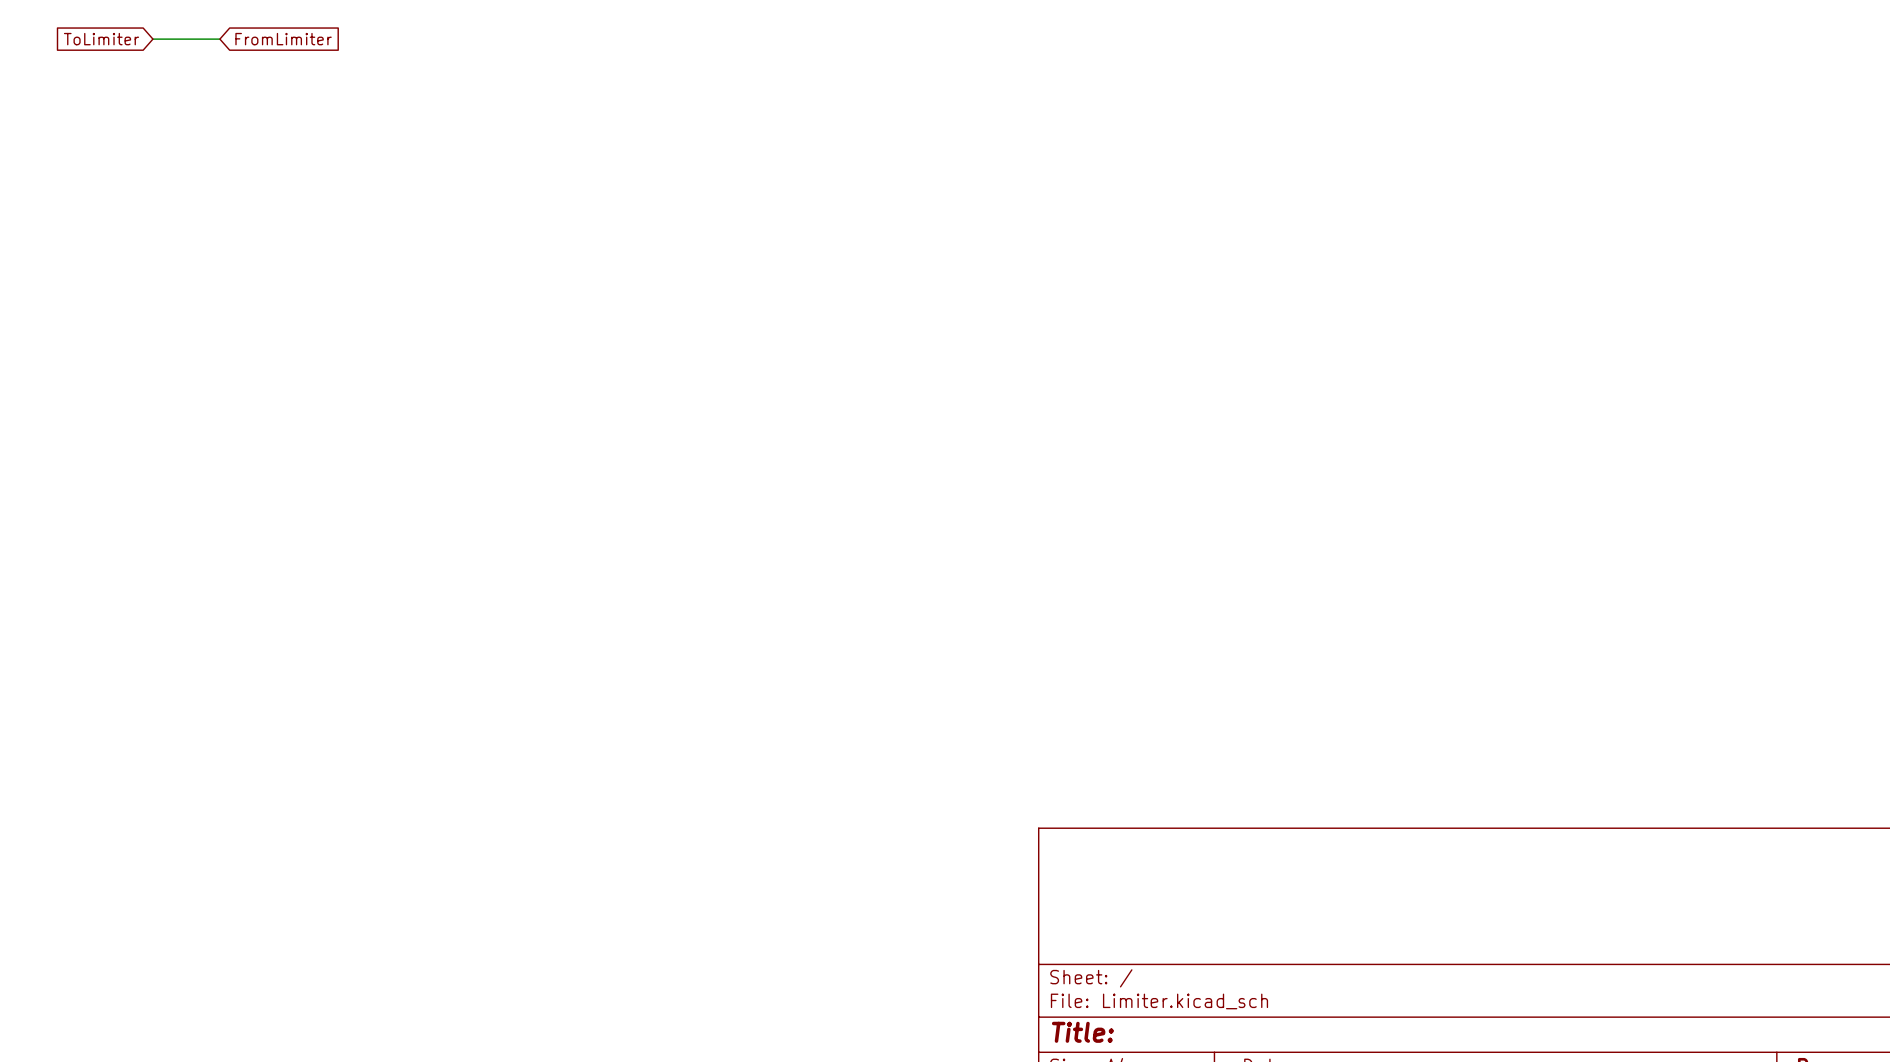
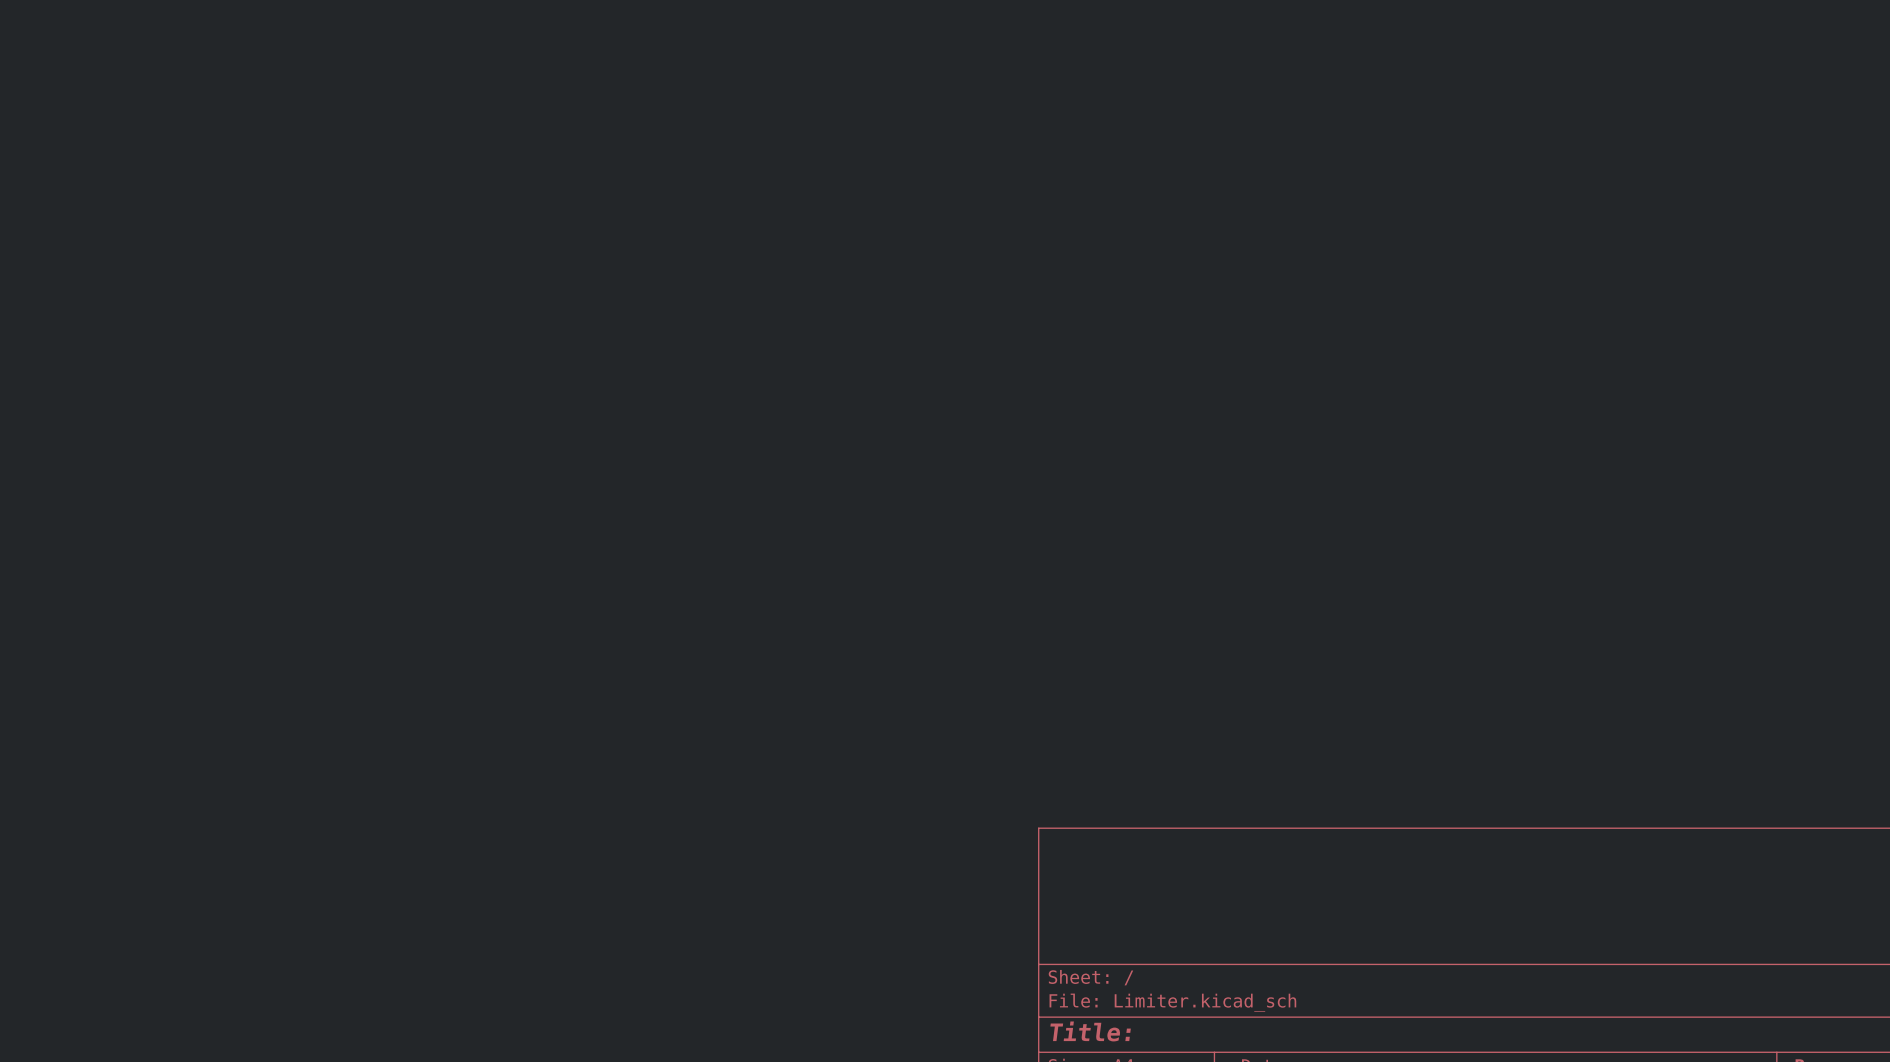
global label: ToLimiter (101, 39) -> none
wire: (152, 39) (219, 39) -> none
global label: FromLimiter (283, 39) -> none

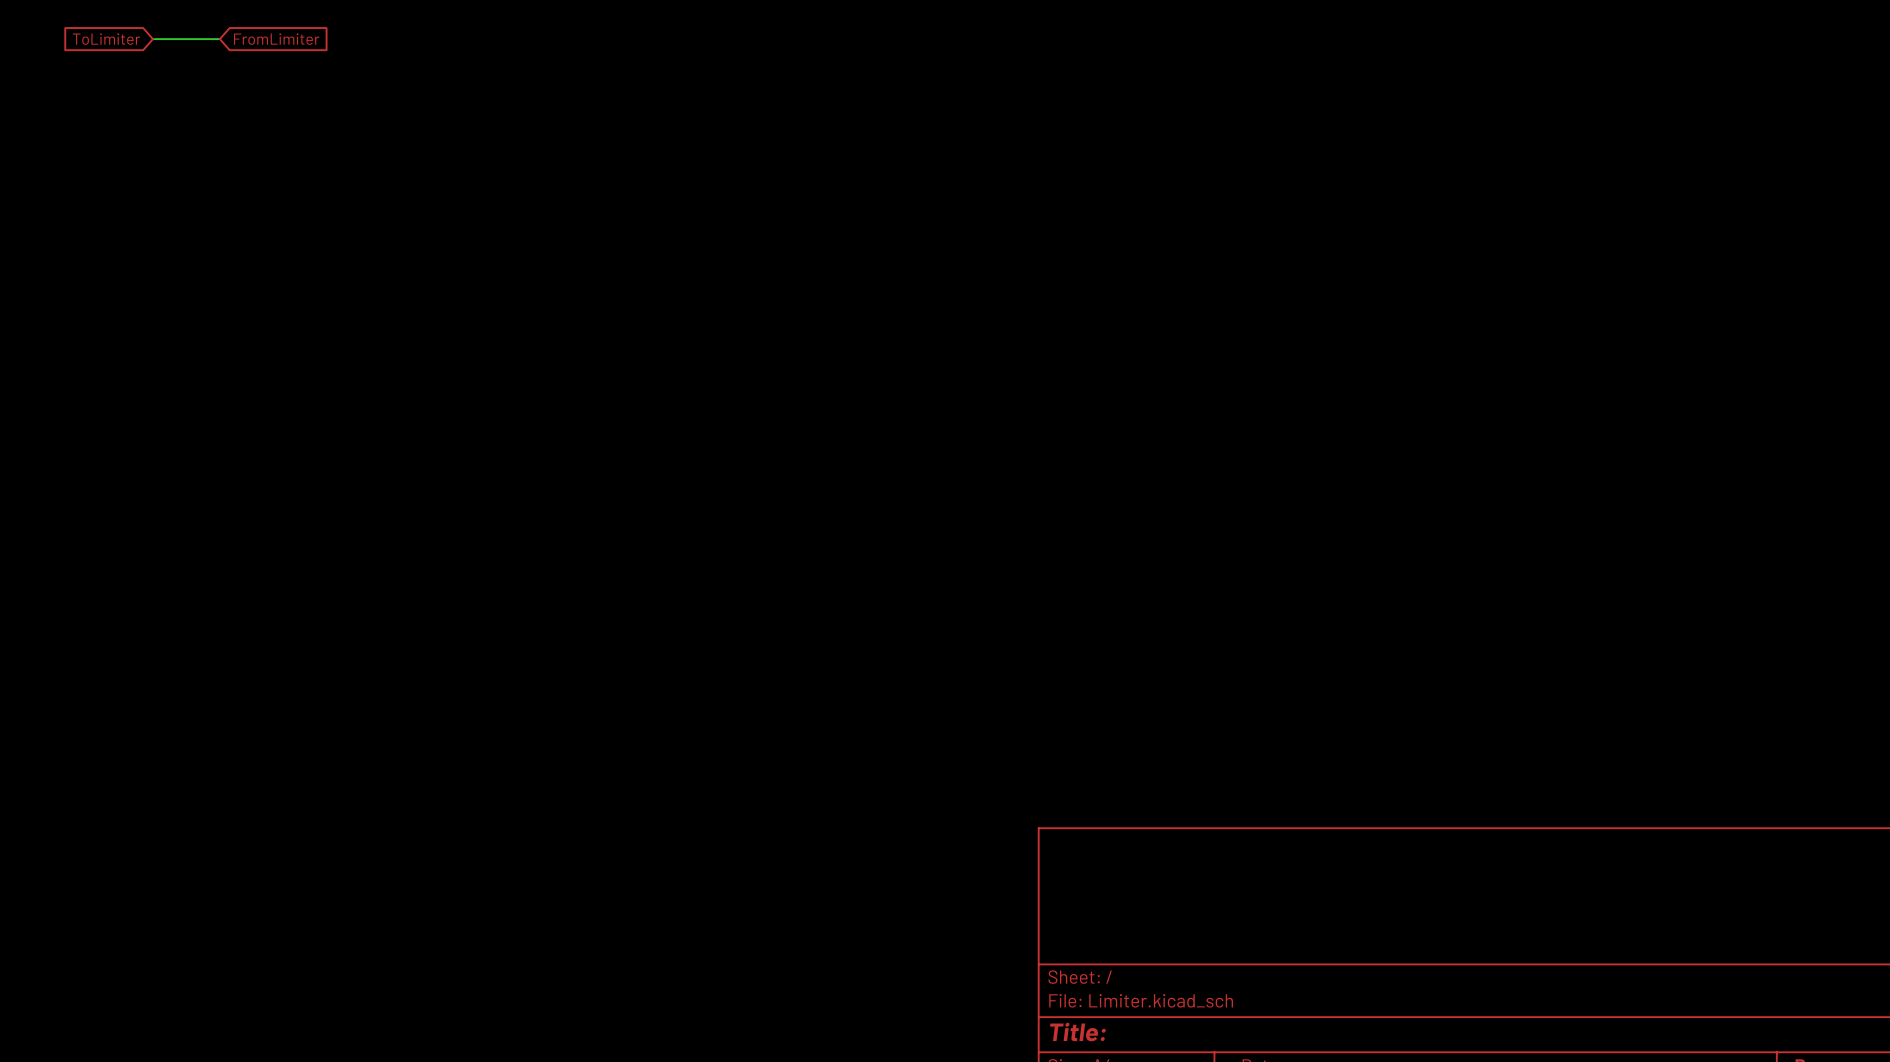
global label: none -> ToLimiter (106, 39)
global label: none -> FromLimiter (276, 39)
wire: none -> (152, 39) (219, 39)

